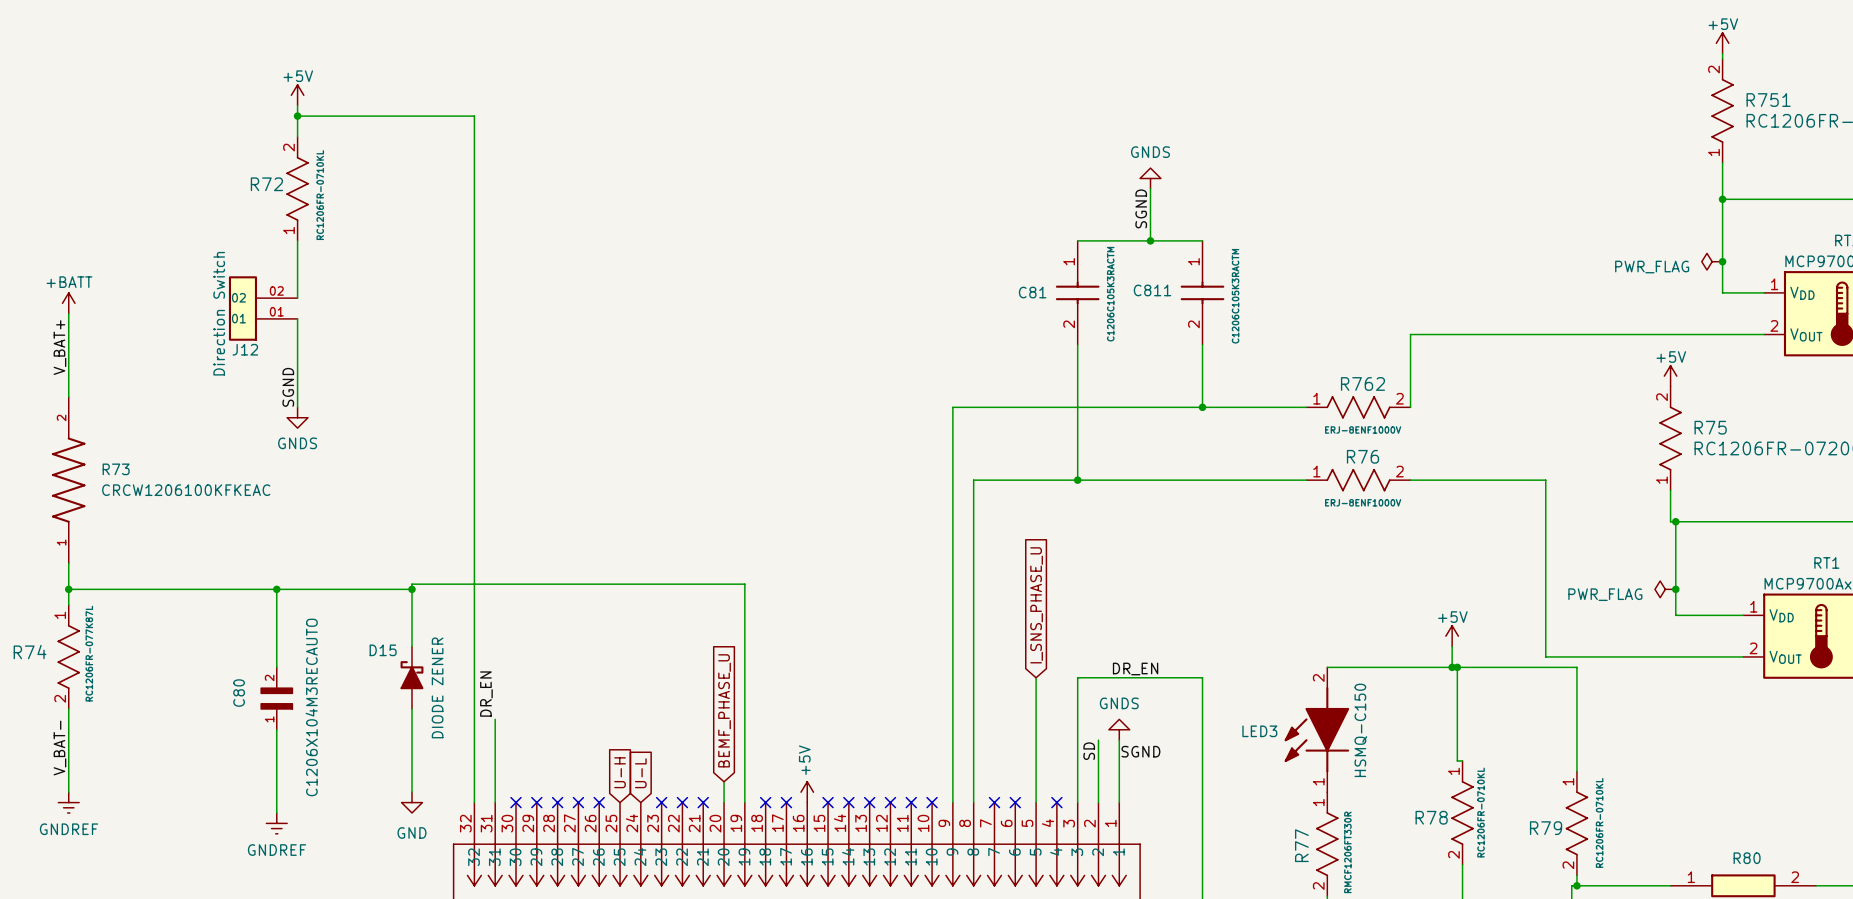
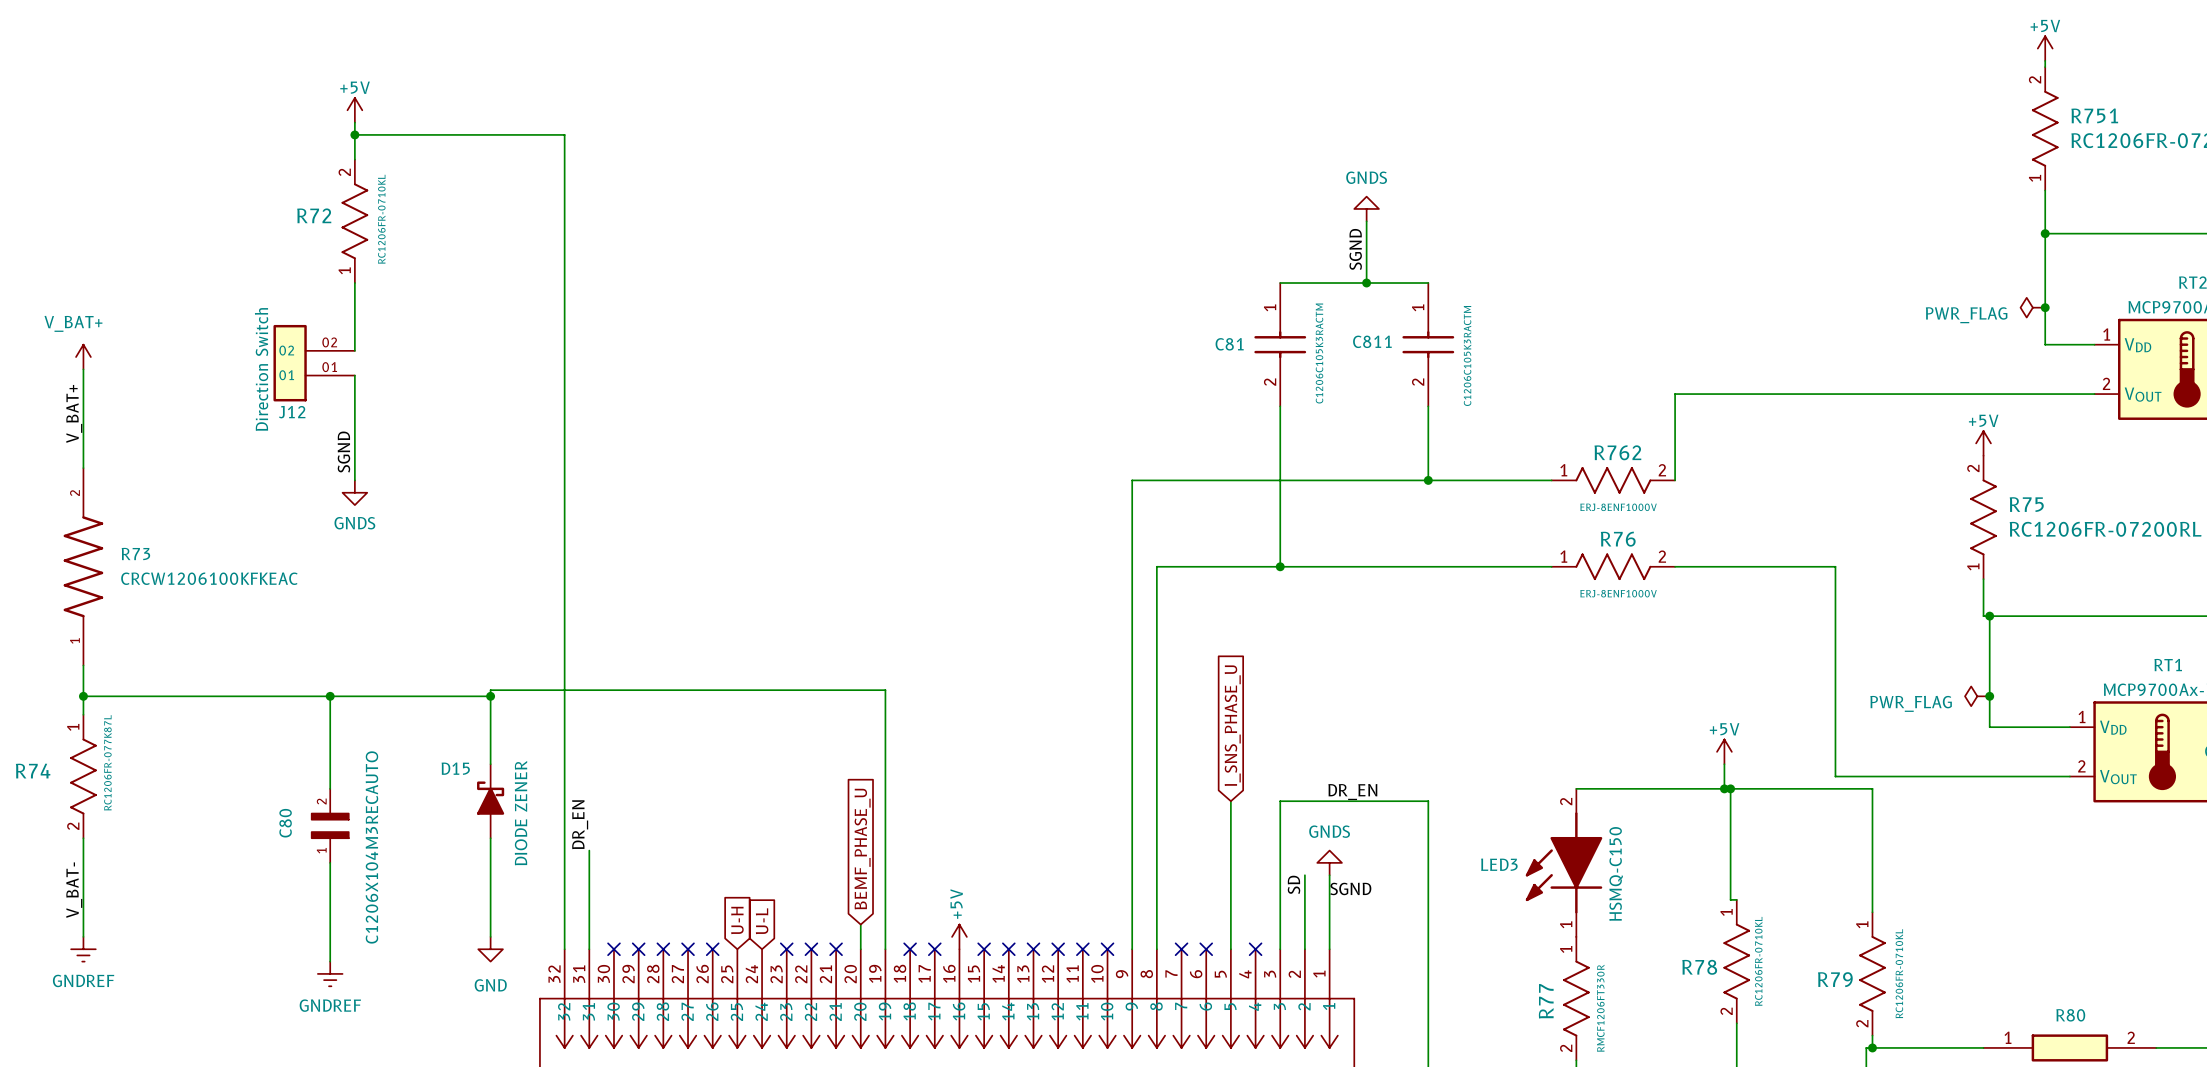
power symbol: +BATT (68, 303) -> V_BAT+ (83, 357)

